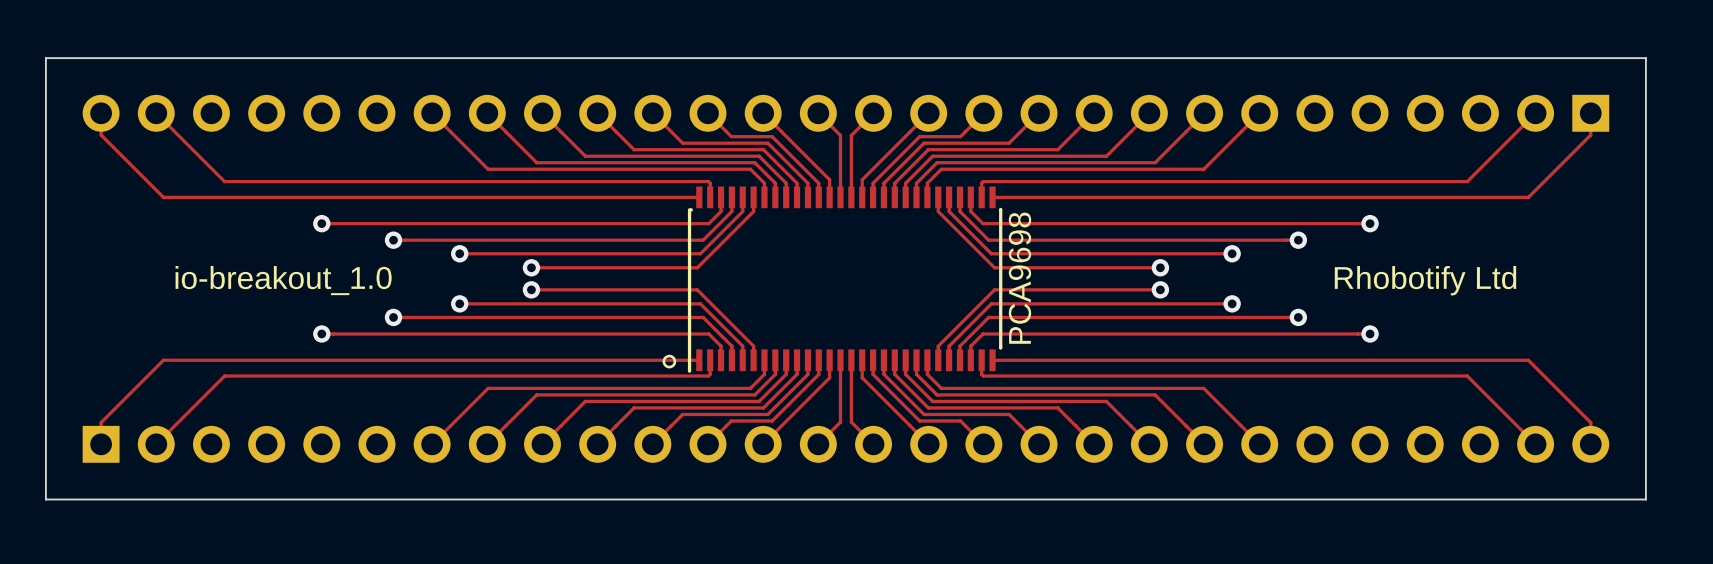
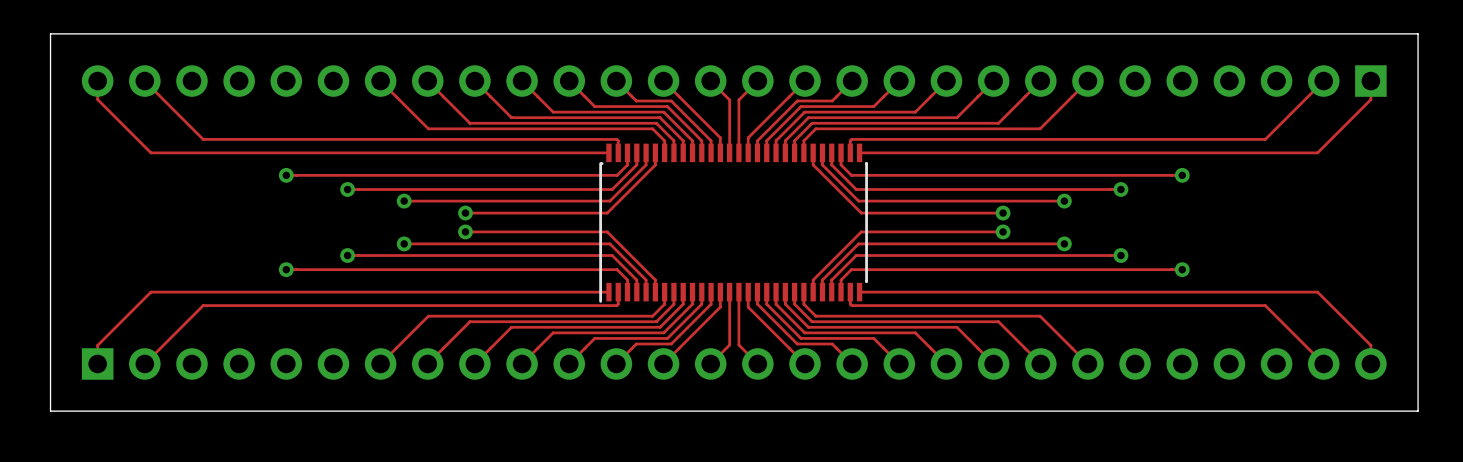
part value: PCA9698 (1019, 278) -> none
text: io-breakout_1.0 (283, 280) -> none
text: Rhobotify Ltd (1425, 280) -> none
drawing: [662, 354, 677, 369] -> none

